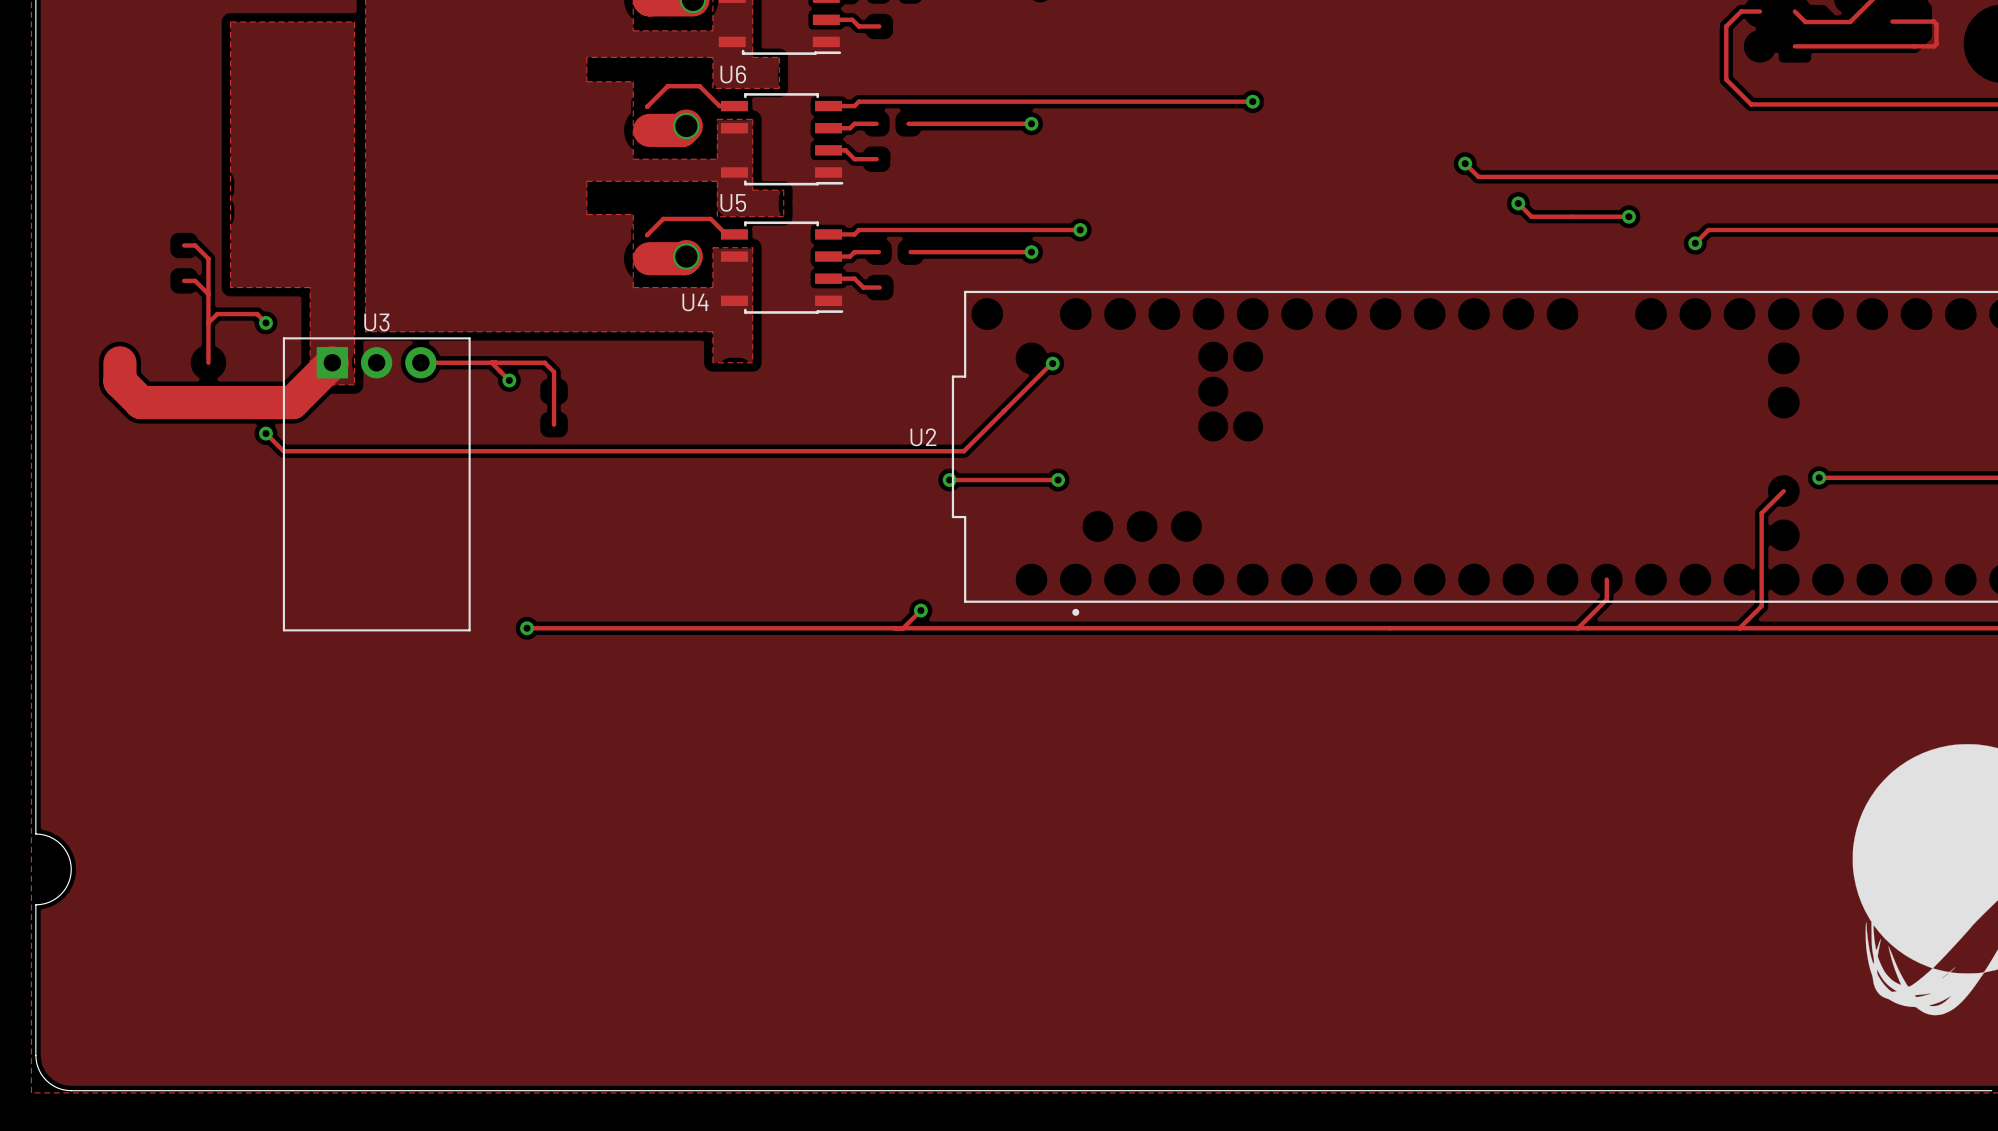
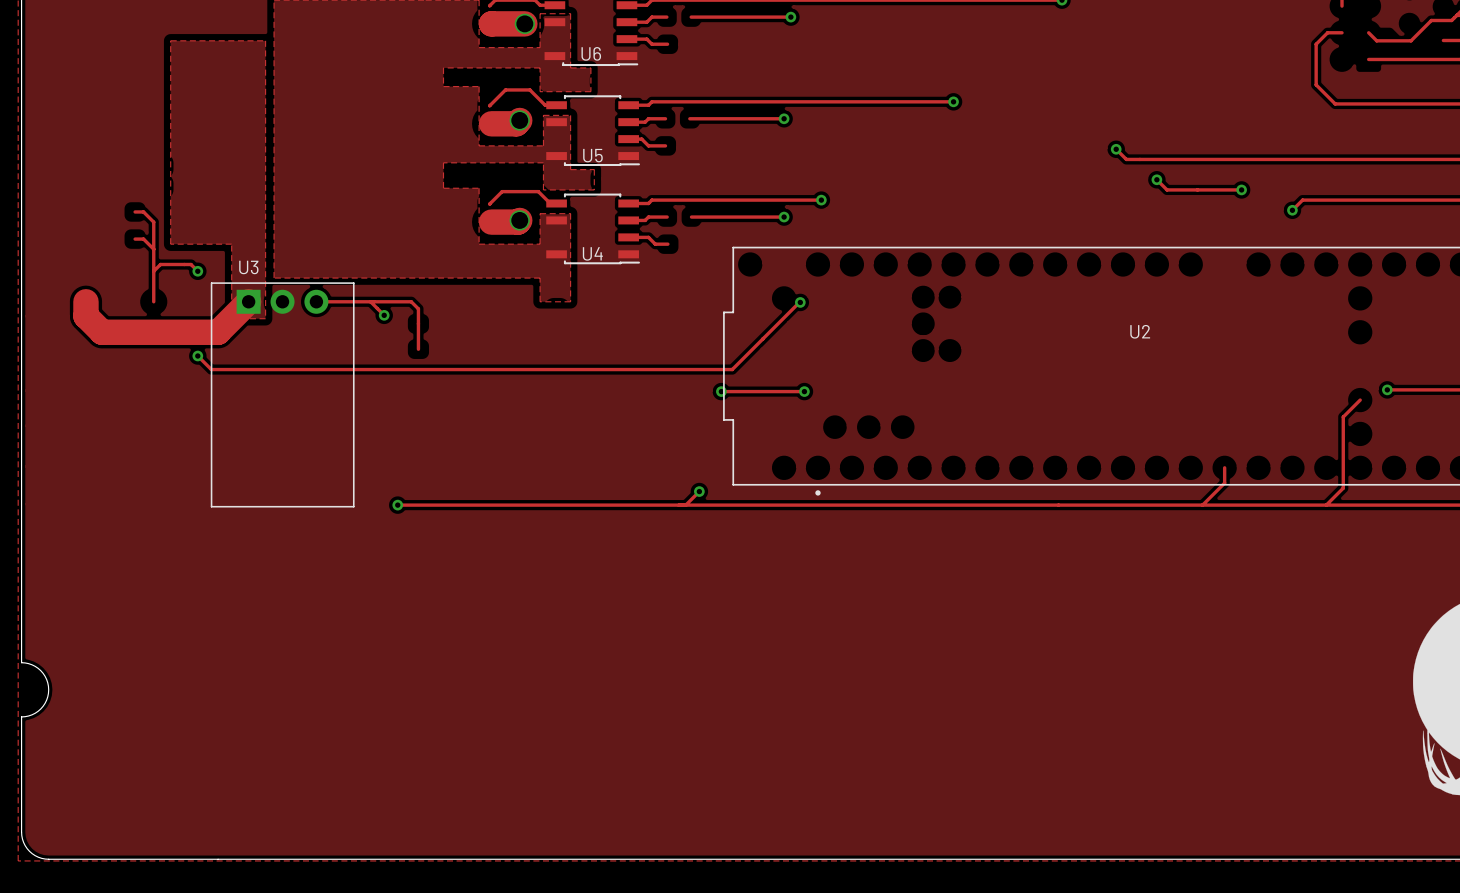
U6 name position: U6 (733, 74) -> U6 (591, 53)
U5 name position: U5 (733, 202) -> U5 (592, 155)
U4 name position: U4 (695, 302) -> U4 (592, 253)
U3 name position: U3 (376, 322) -> U3 (248, 267)
U2 name position: U2 (923, 437) -> U2 (1140, 331)

